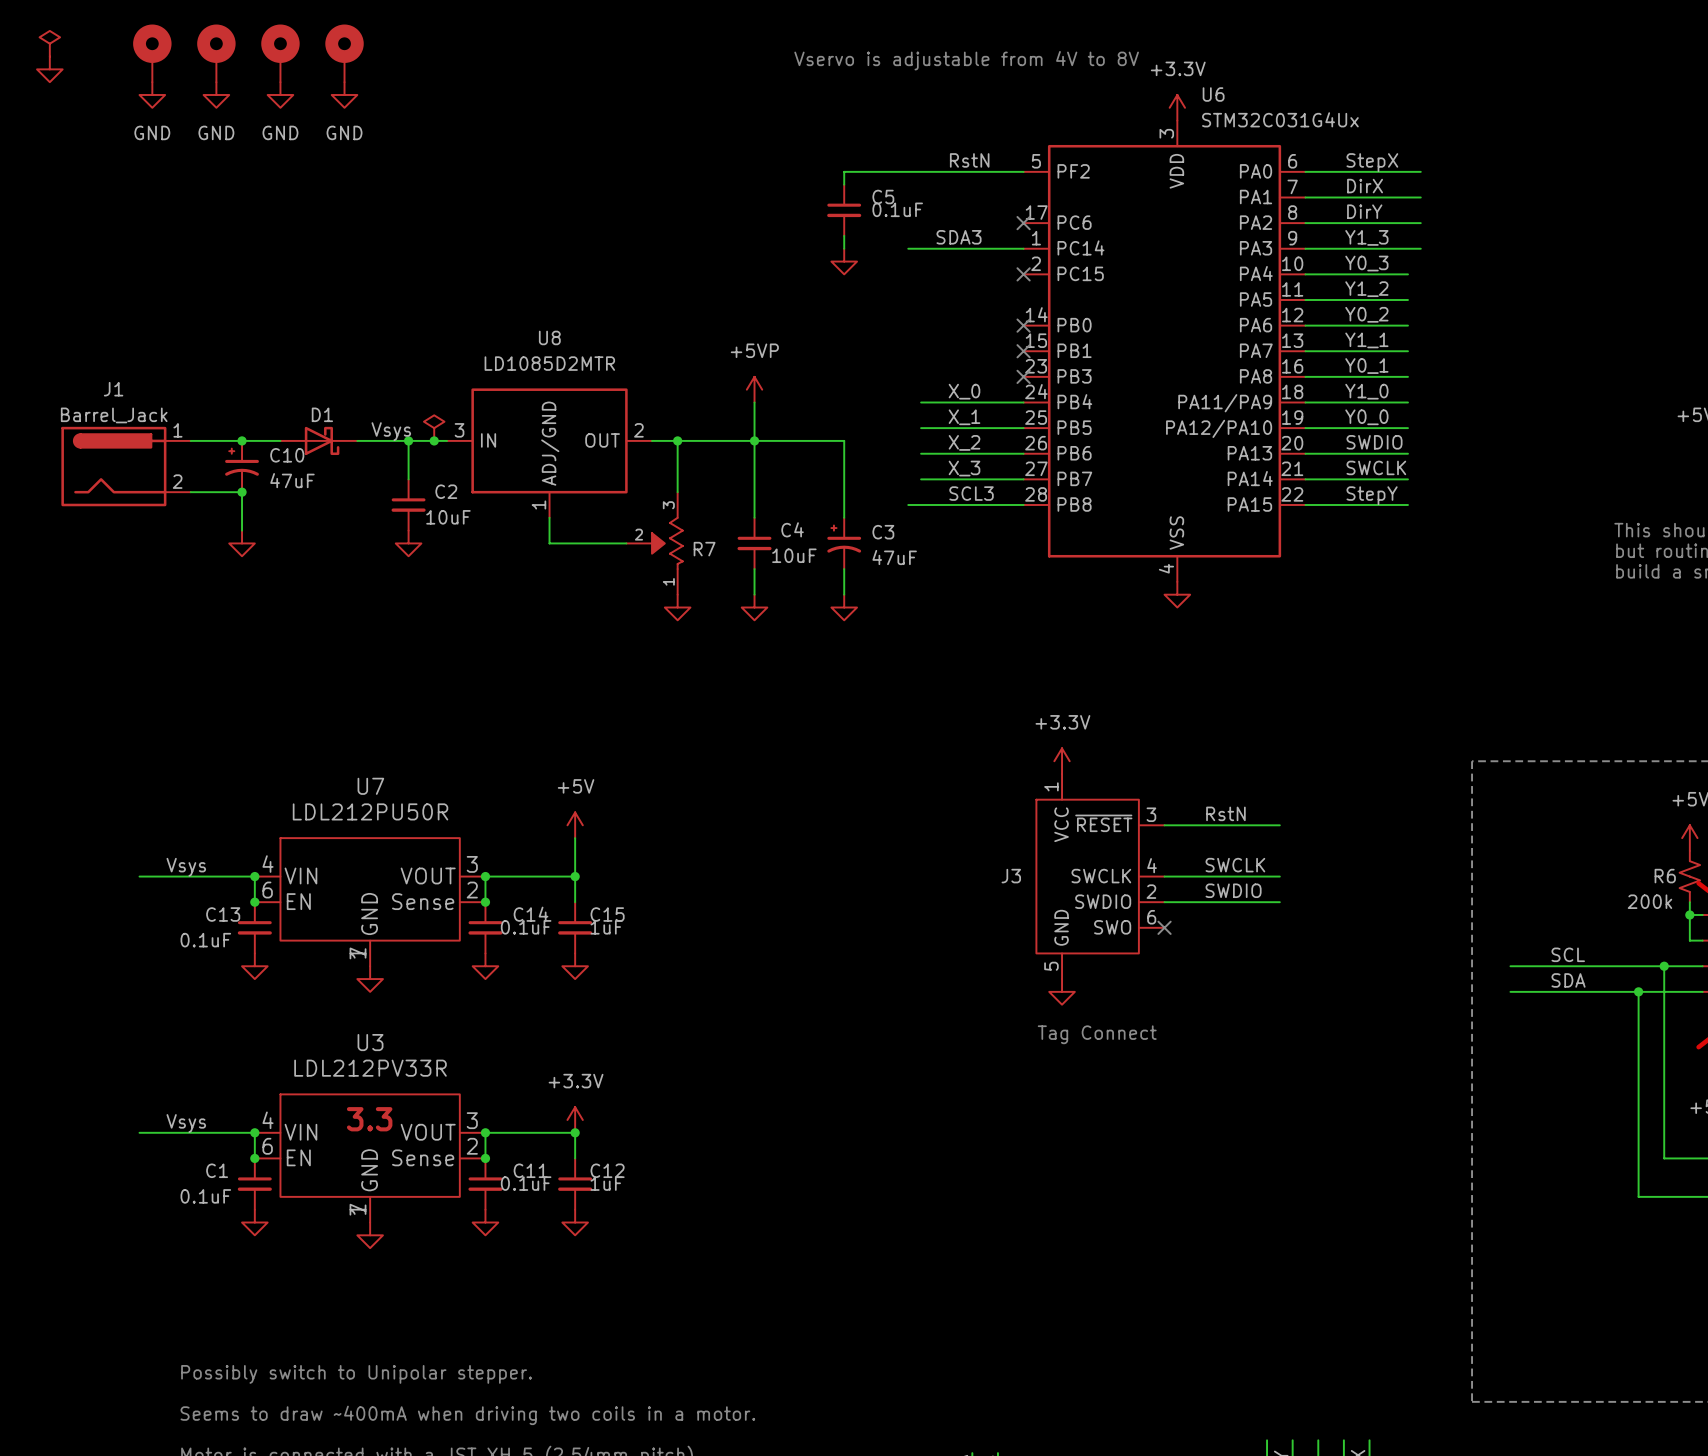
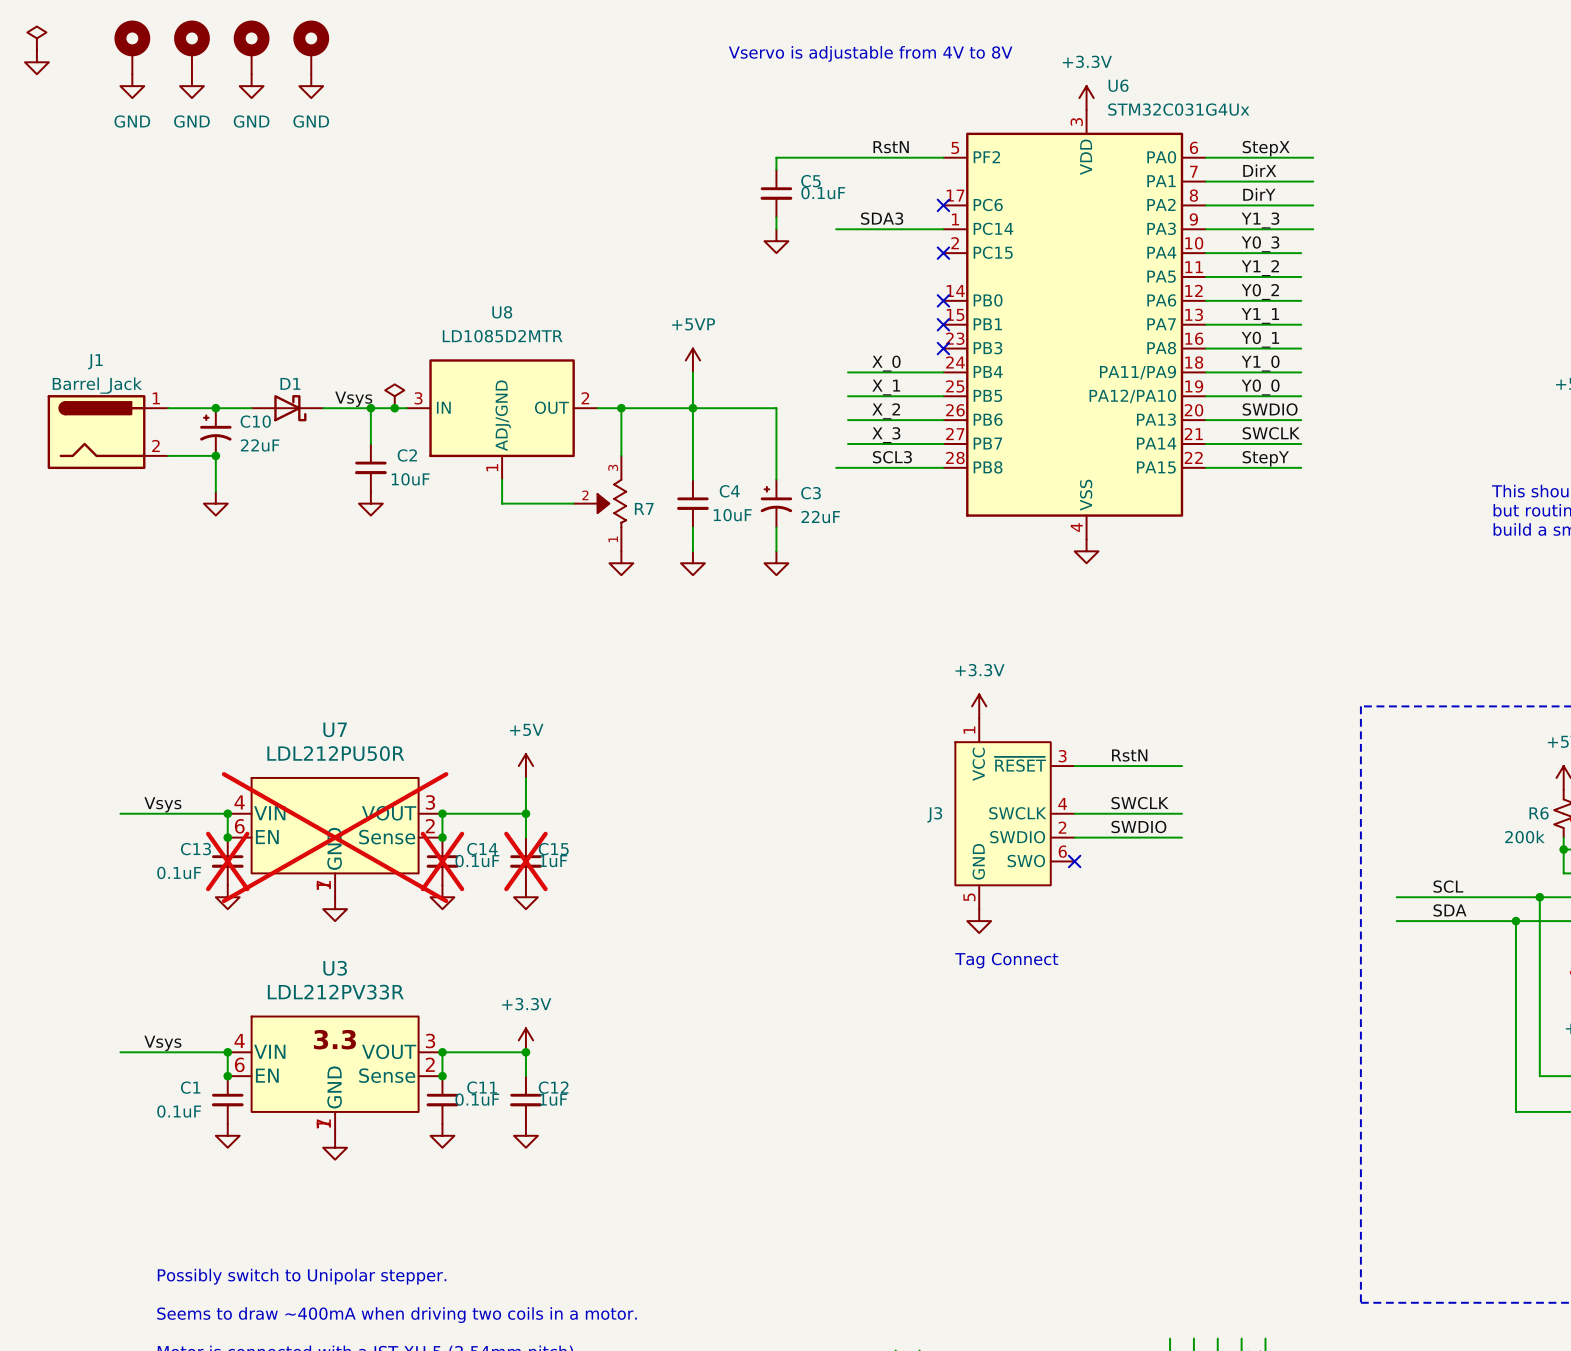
C10 value: 47uF (292, 480) -> 22uF (260, 445)
C3 value: 47uF (894, 557) -> 22uF (820, 517)
U7 do-not-place cross: none -> (335, 837)
C13 do-not-place cross: none -> (227, 861)
C14 do-not-place cross: none -> (442, 861)
C15 do-not-place cross: none -> (525, 861)

